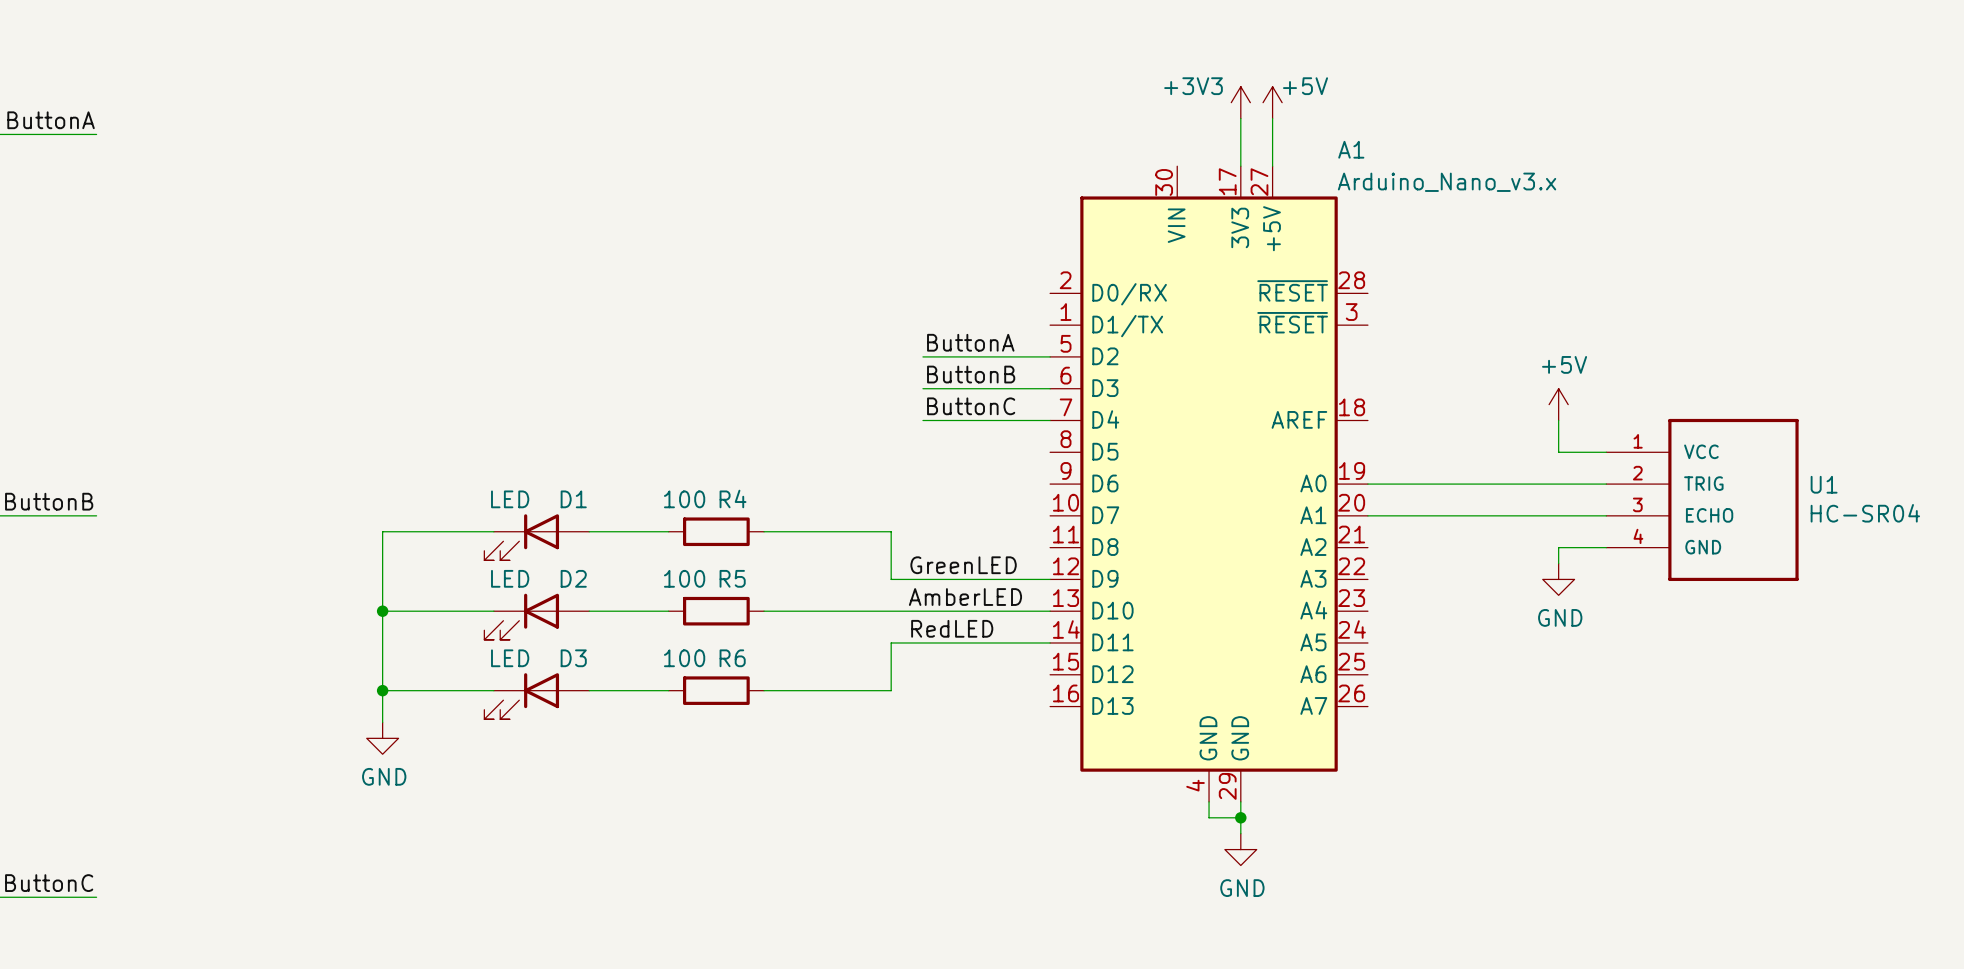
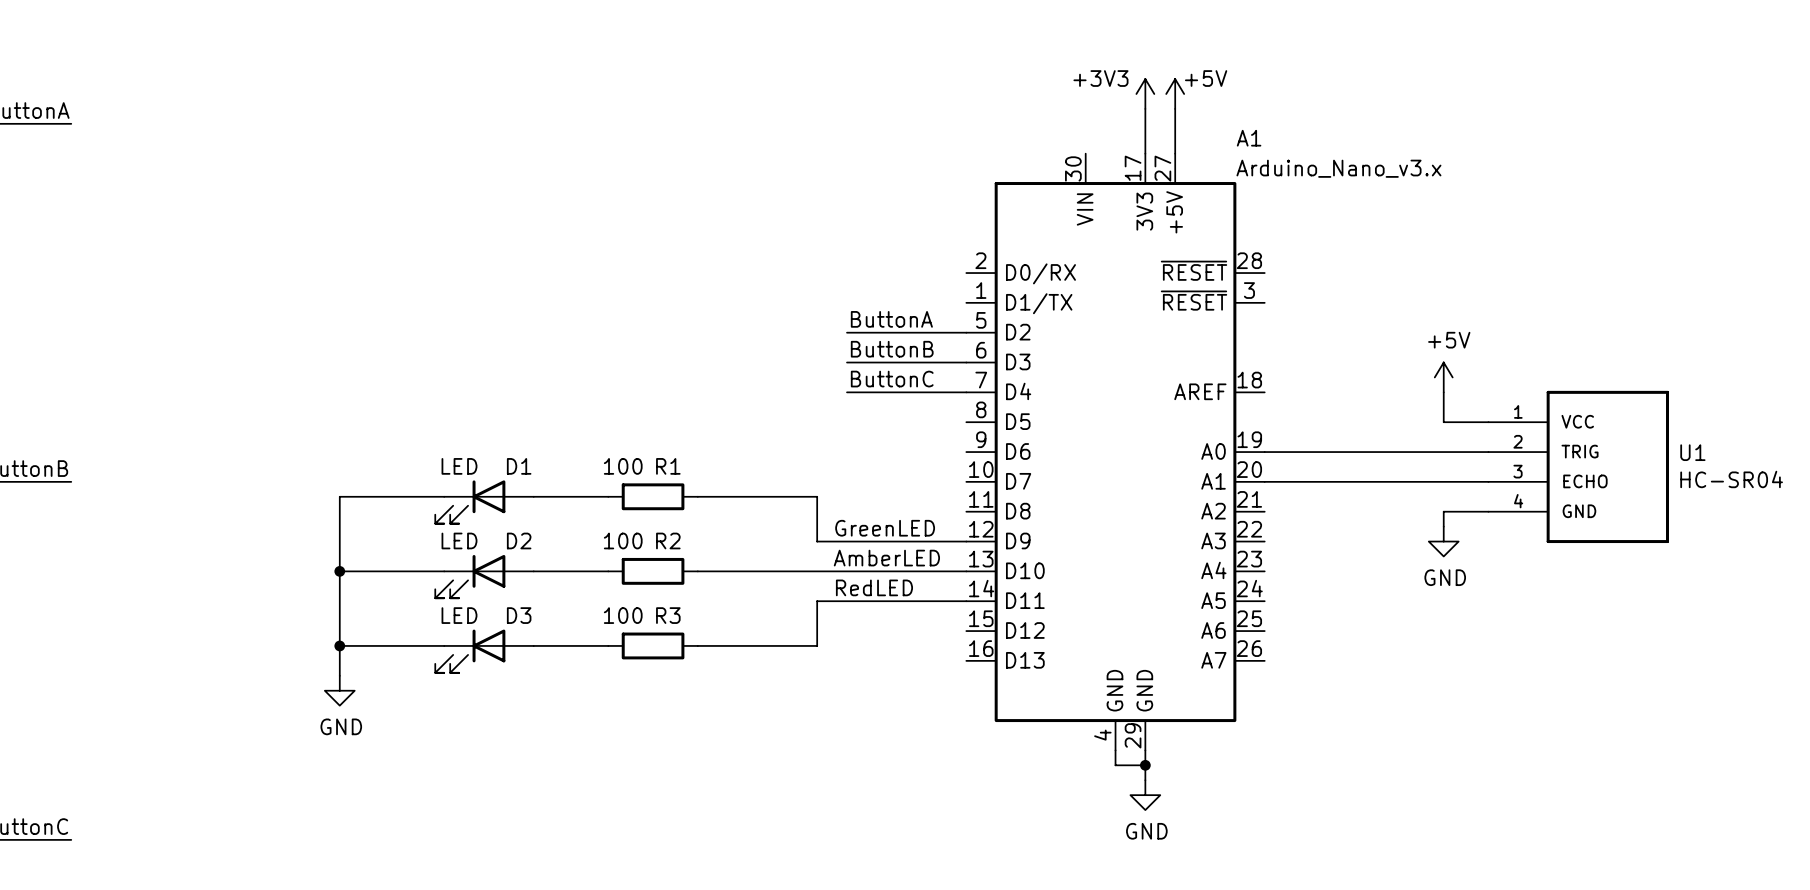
R4 name: R4 (733, 498) -> R1 (668, 466)
R5 name: R5 (732, 578) -> R2 (668, 540)
R6 name: R6 (732, 658) -> R3 (668, 615)

